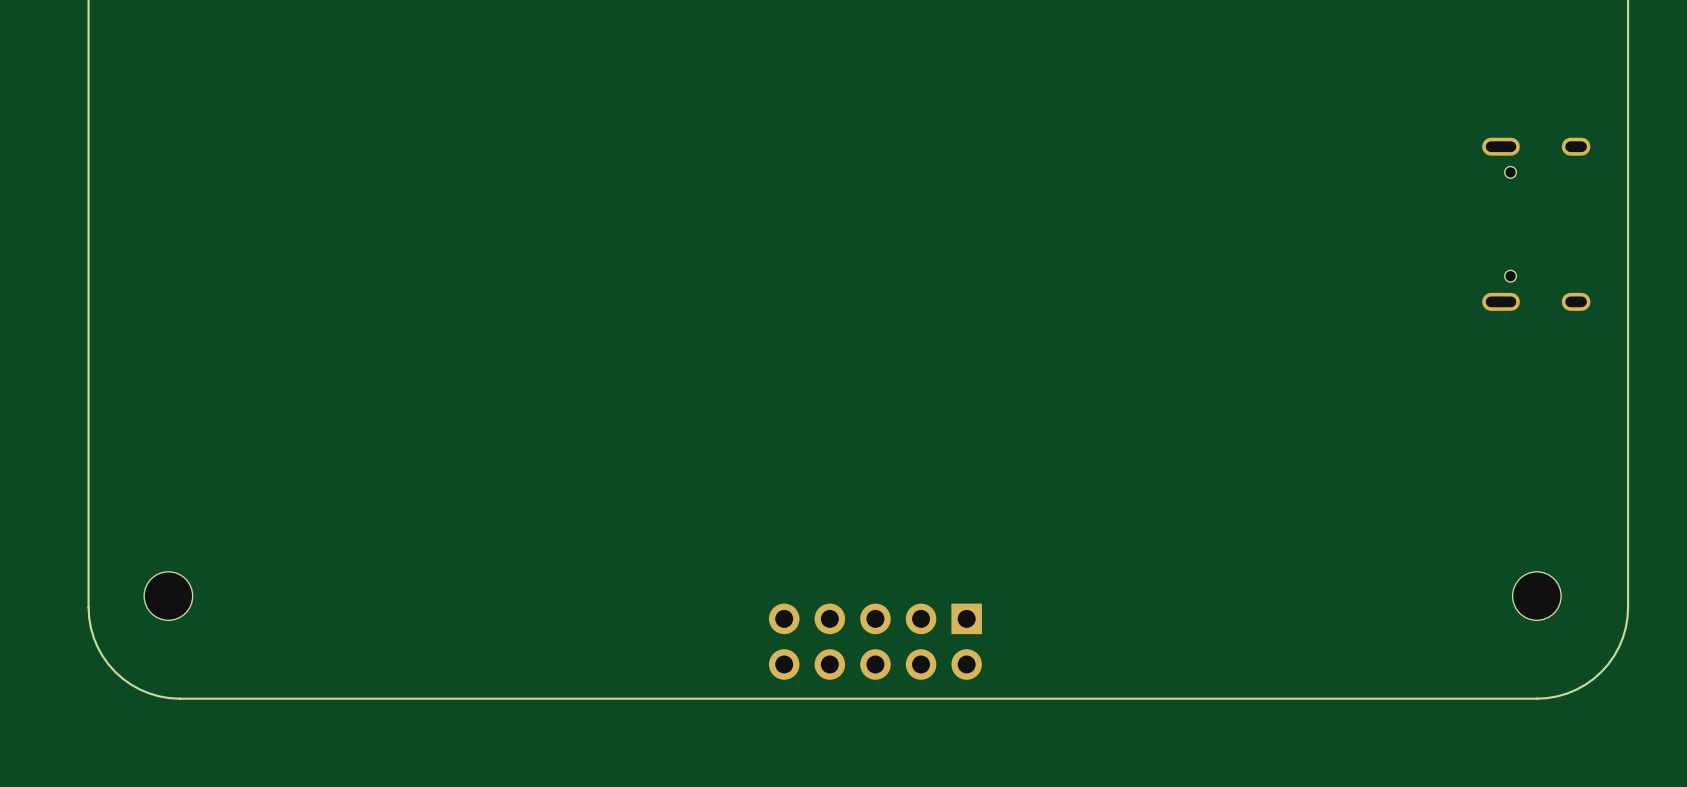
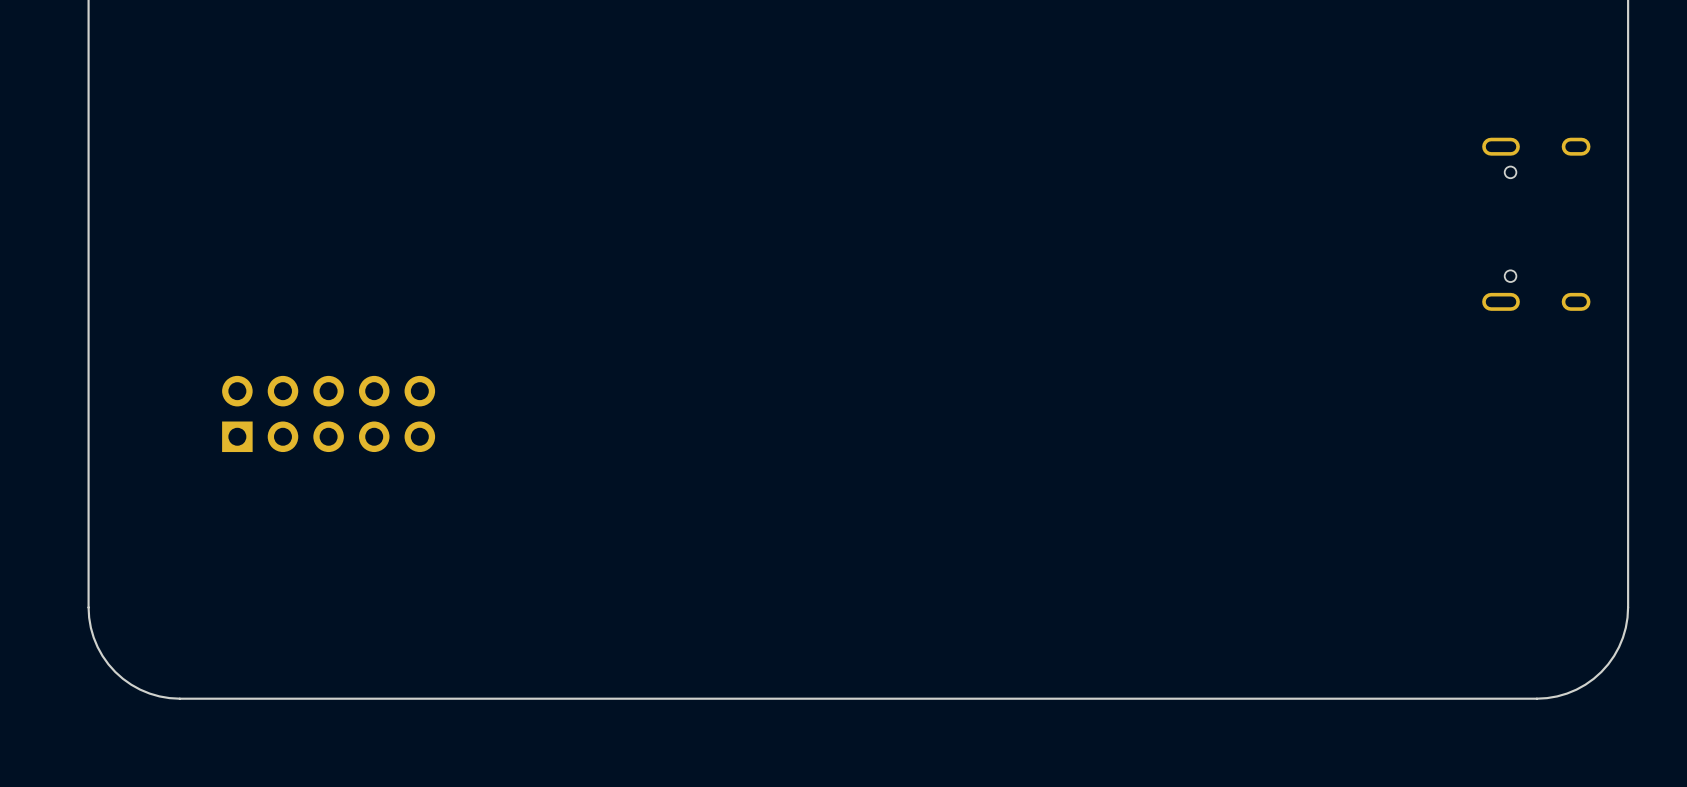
part: none -> (328, 413)
part: (168, 596) -> none
part: (1536, 596) -> none
part: (875, 641) -> none

